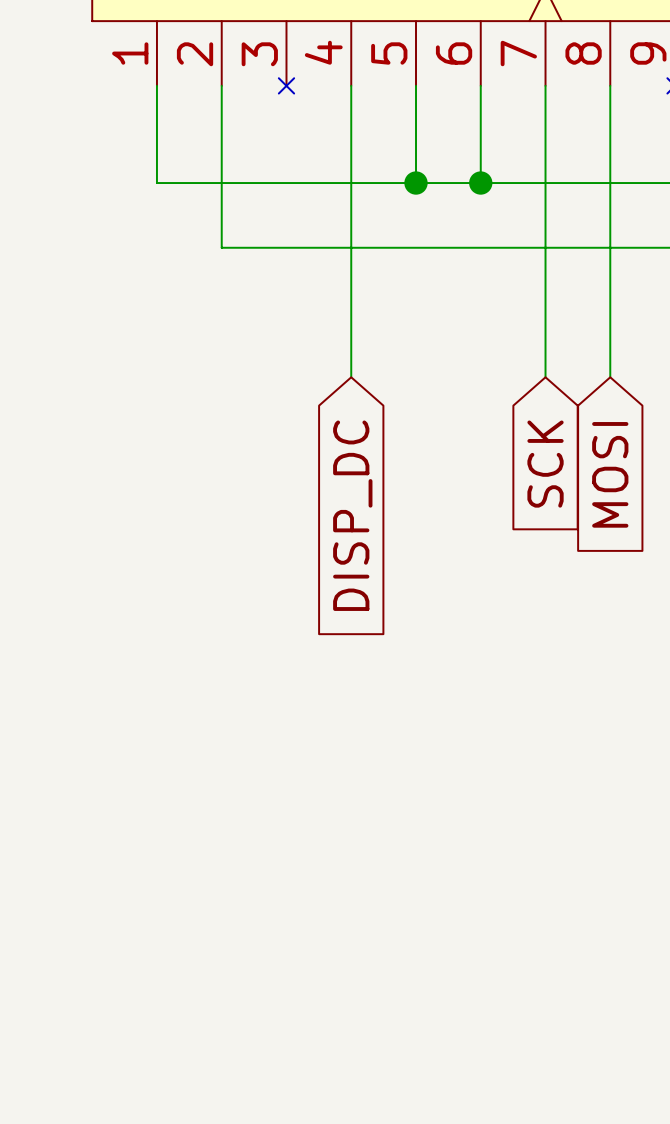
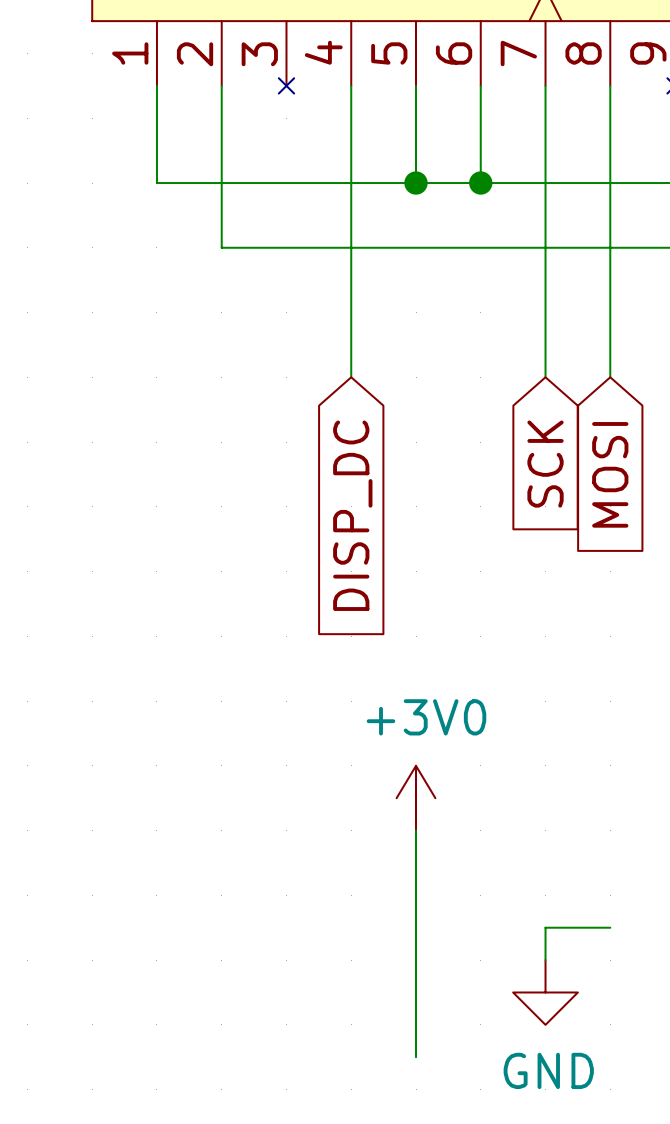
power symbol: none -> +3V0 (416, 798)
wire: none -> (416, 830) (416, 1057)
wire: none -> (610, 927) (545, 927) (545, 960)
power symbol: none -> GND (545, 992)

